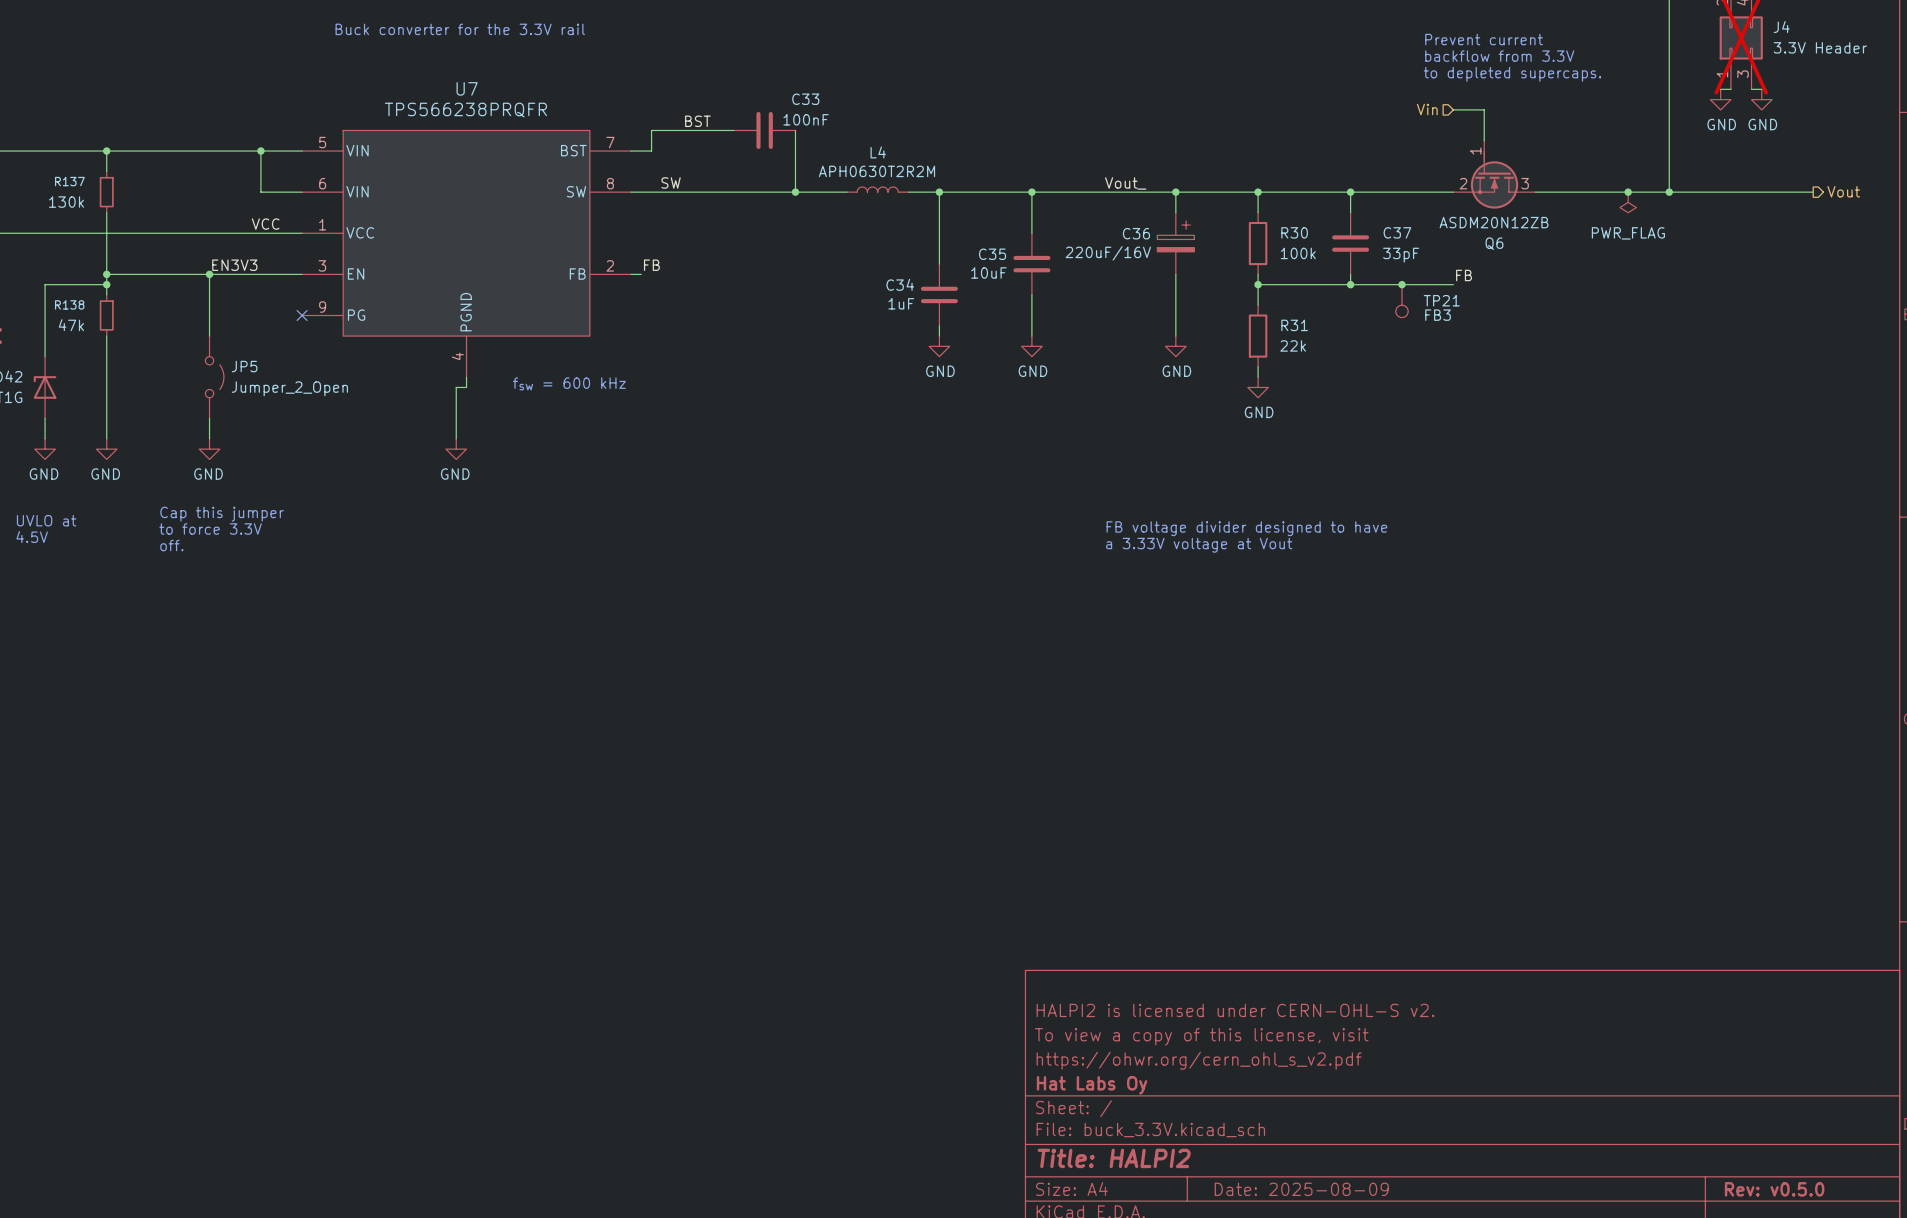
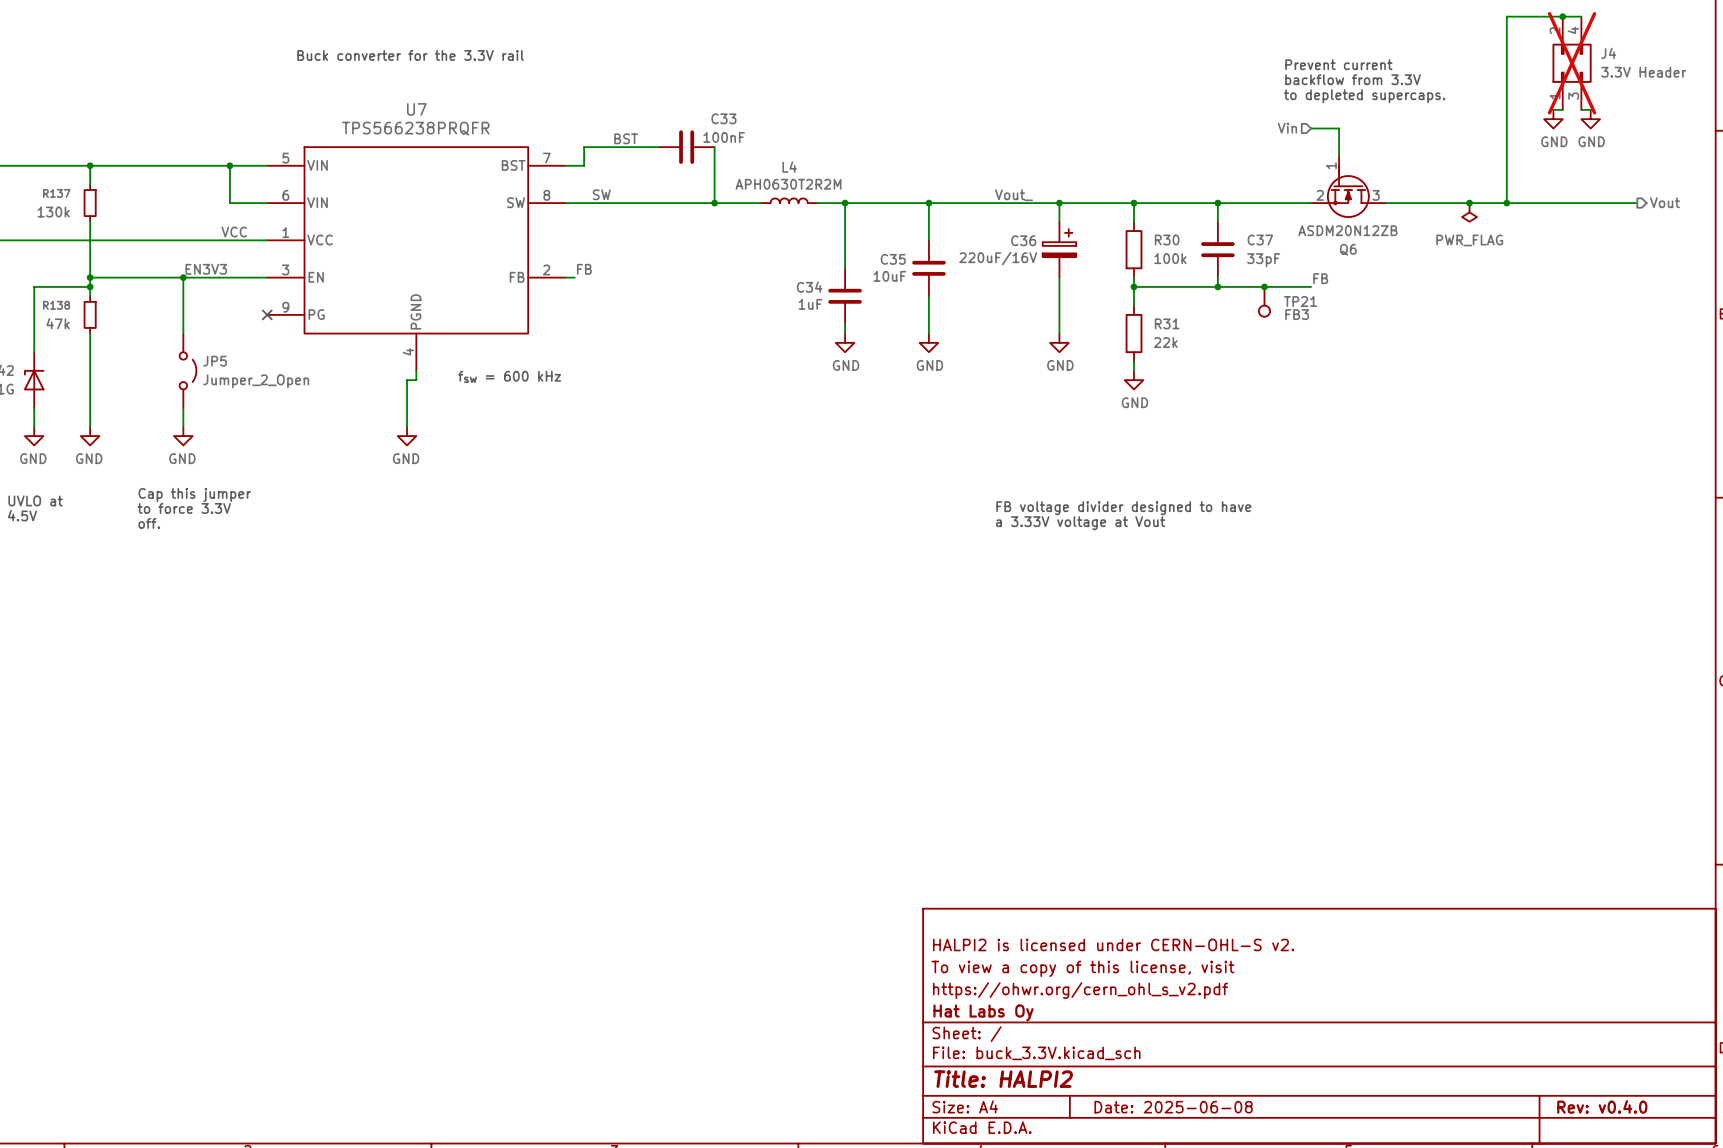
title block: Date: 2025-08-09 (1301, 1189) -> Date: 2025-06-08 (1173, 1107)
title block: Rev: v0.5.0 (1774, 1189) -> Rev: v0.4.0 (1602, 1106)

